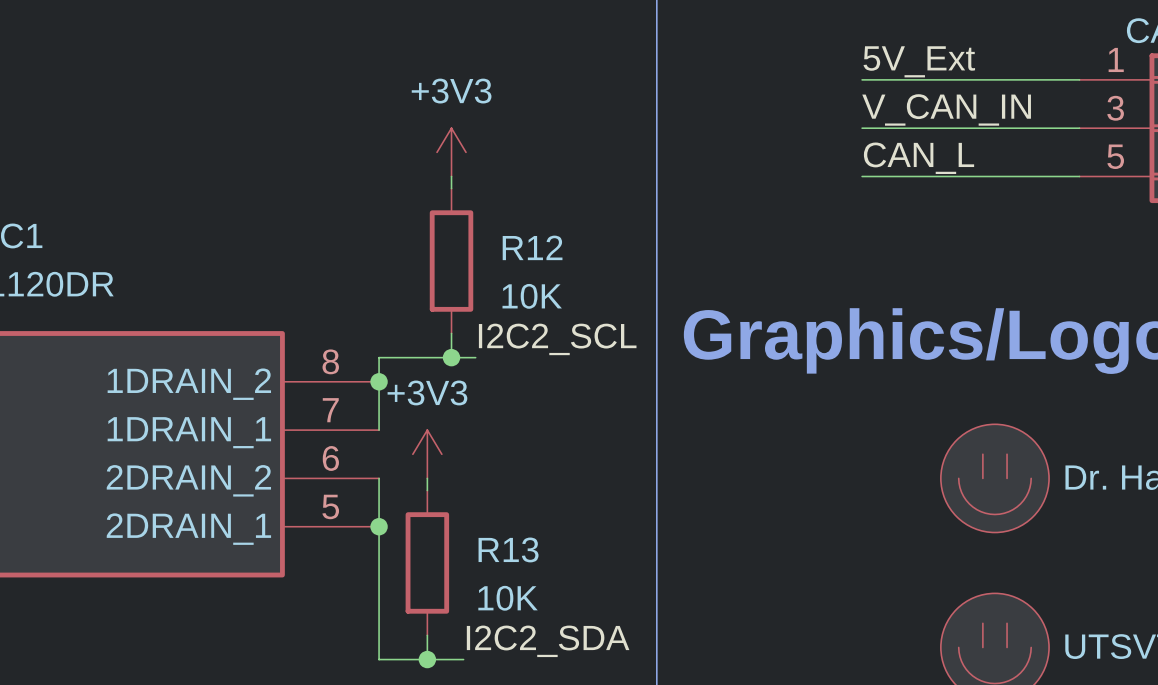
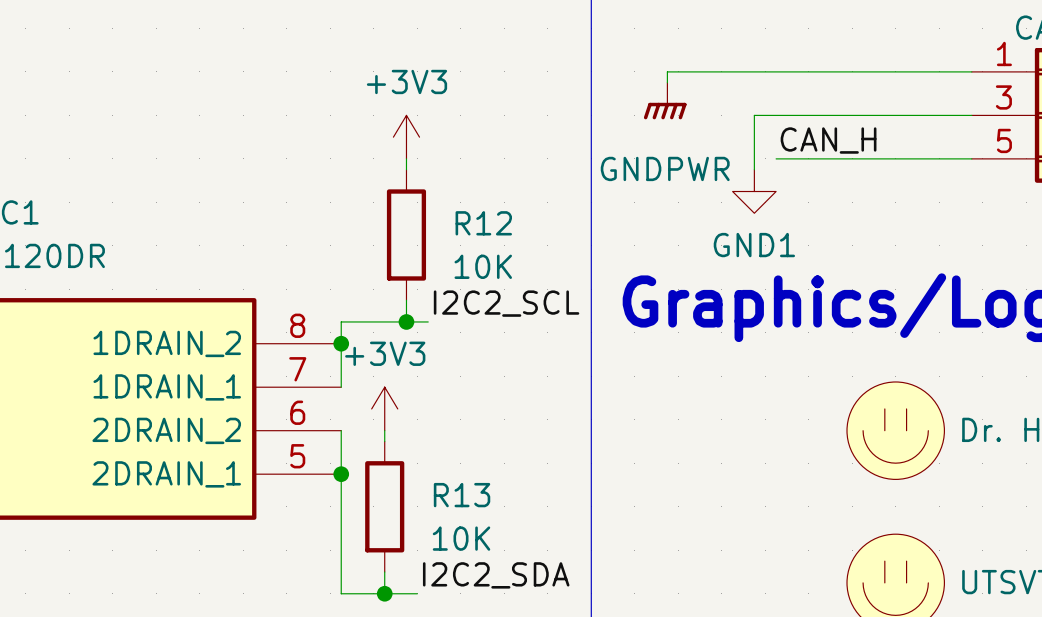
label: 5V_Ext (919, 61) -> none
wire: none -> (776, 71) (667, 71) (667, 82)
label: V_CAN_IN (946, 109) -> none
power symbol: none -> GNDPWR (665, 101)
wire: none -> (776, 115) (754, 115) (754, 169)
label: CAN_L (919, 158) -> CAN_H (828, 140)
power symbol: none -> GND1 (754, 191)

